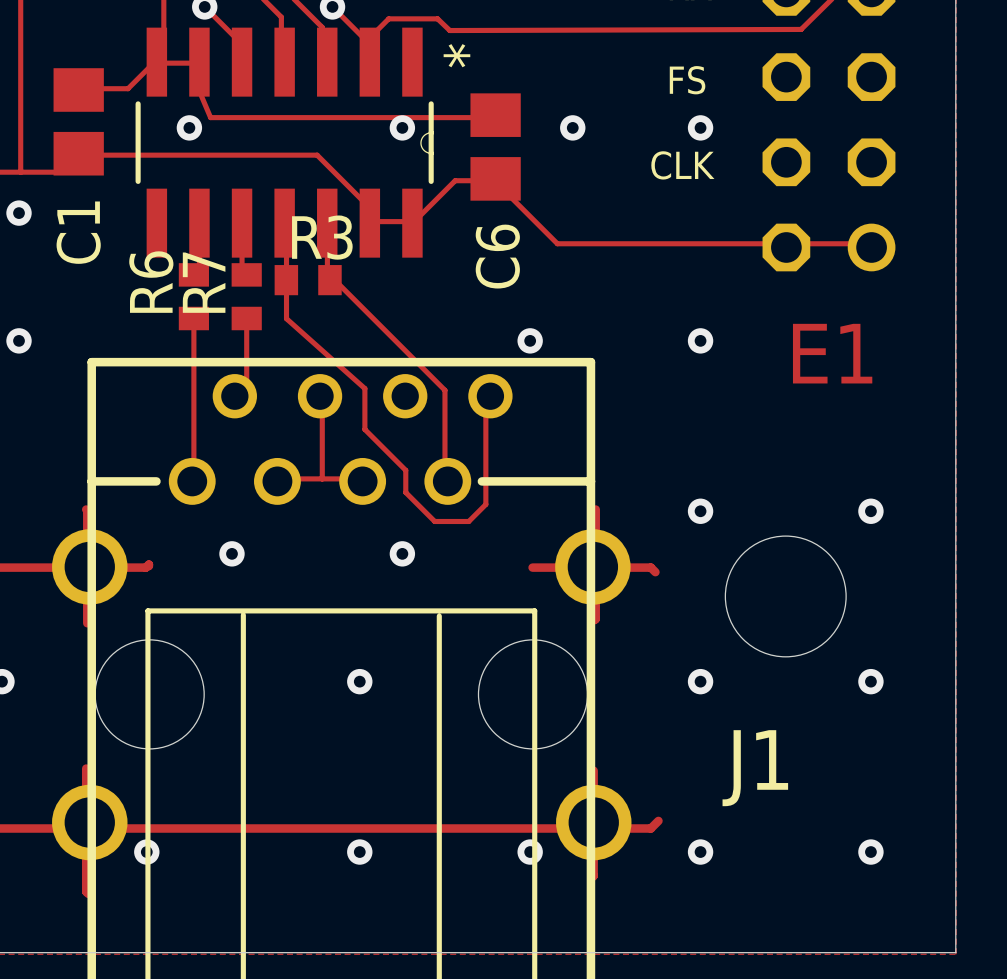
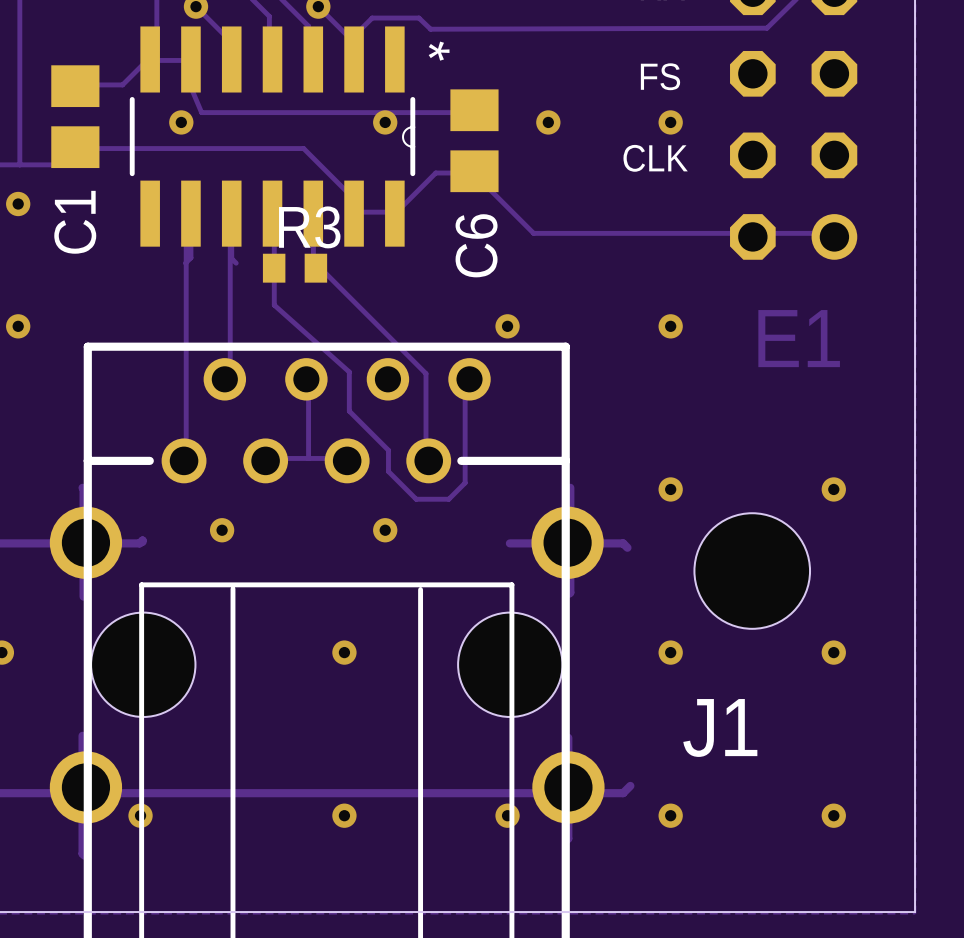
R6: (193, 296) -> none
R7: (246, 296) -> none
track: (193, 318) (194, 477) -> (190, 213) (186, 217) (186, 456)
track: (246, 318) (246, 384) (240, 390) -> (231, 213) (230, 373)

